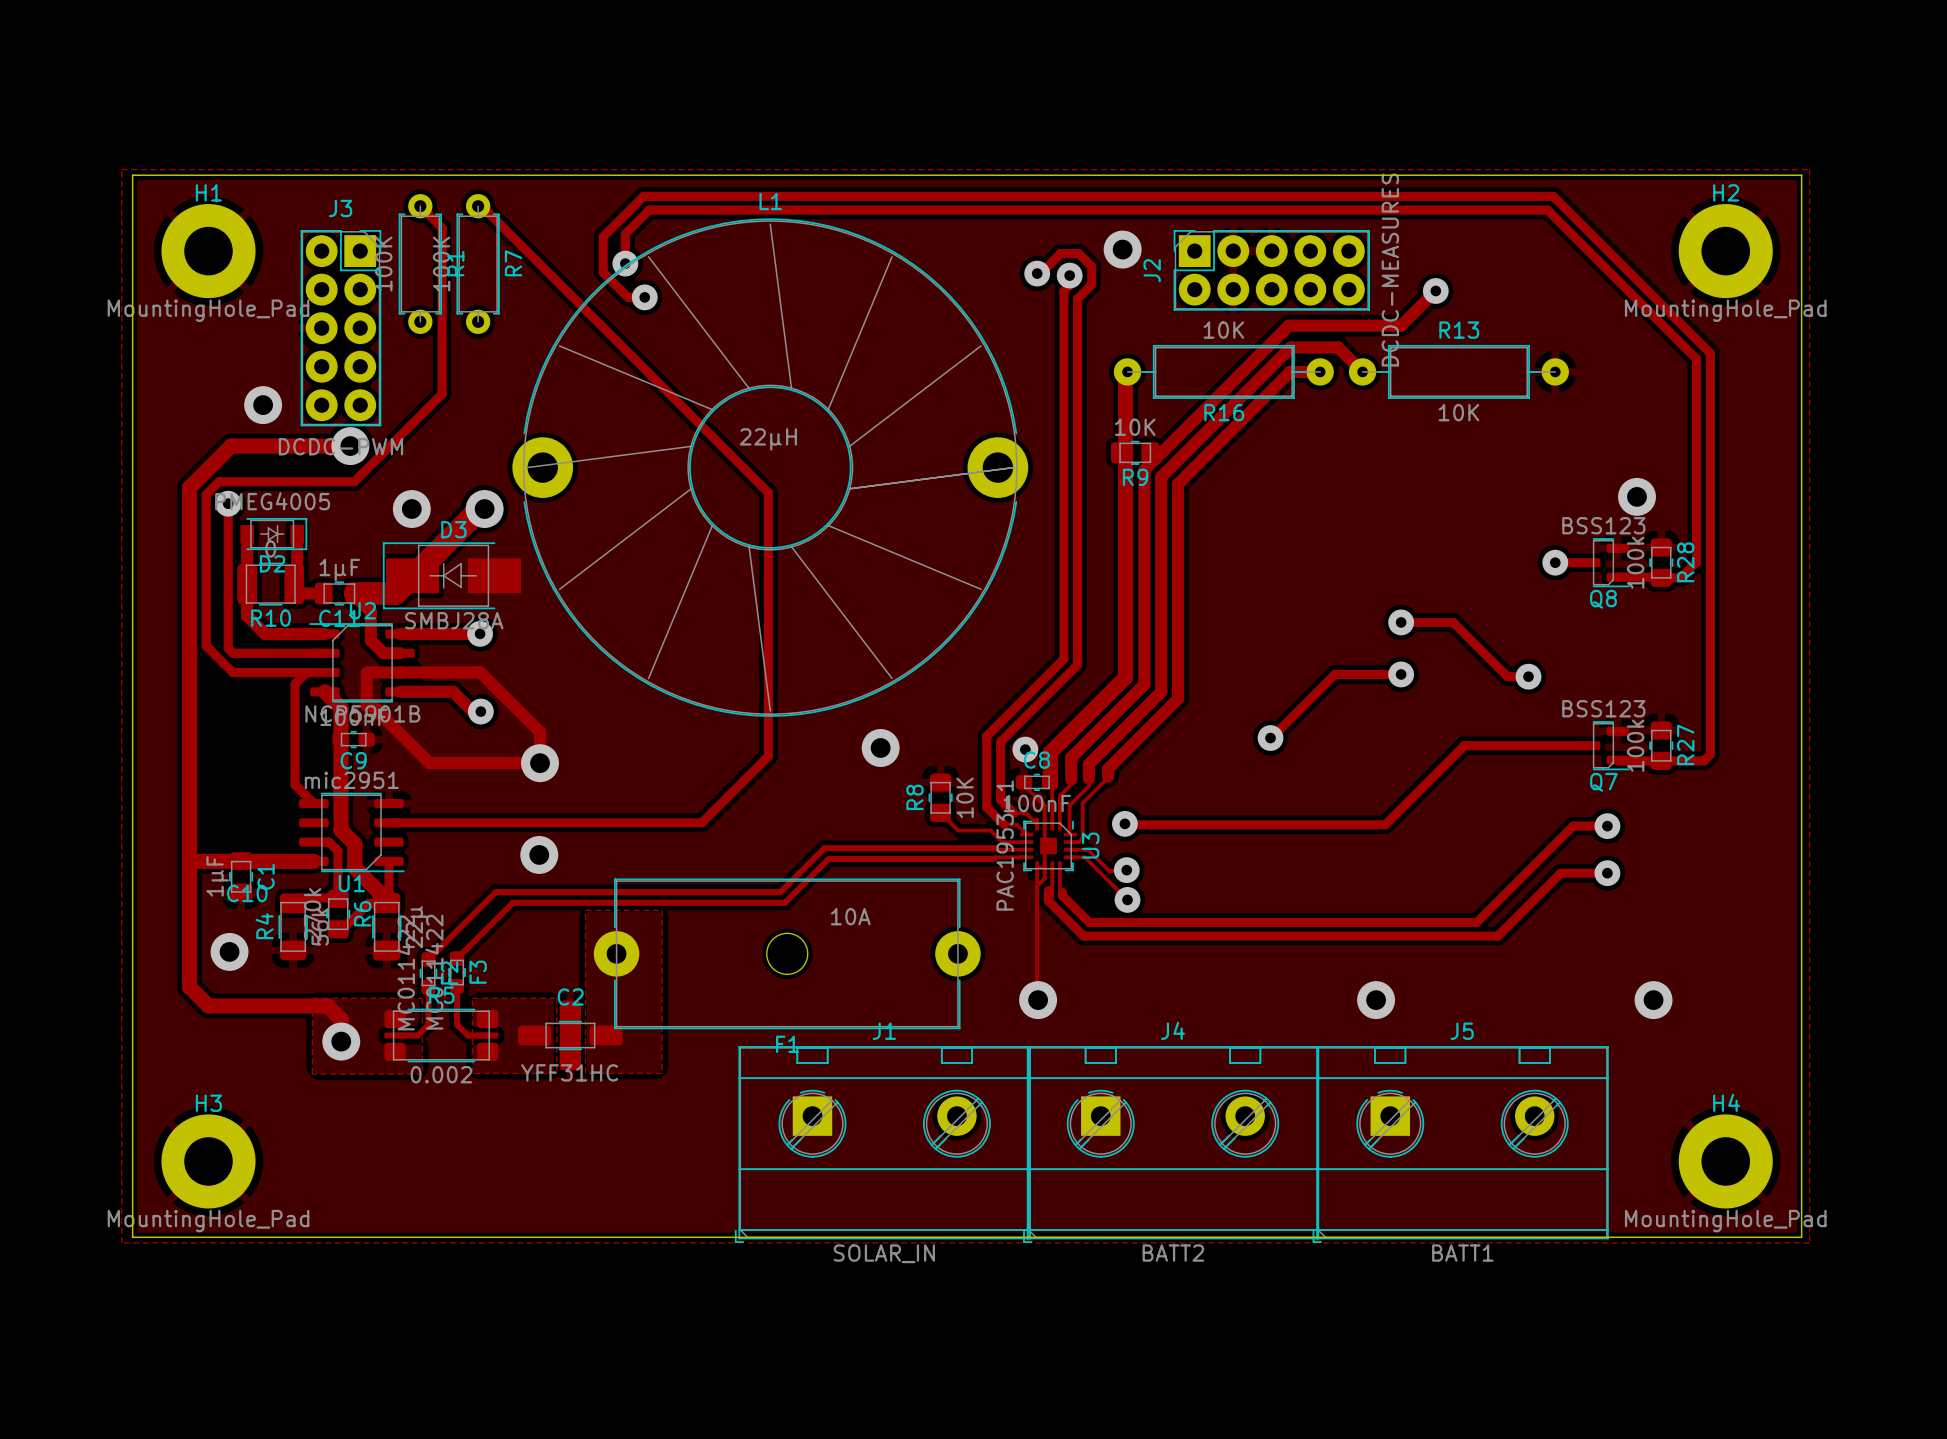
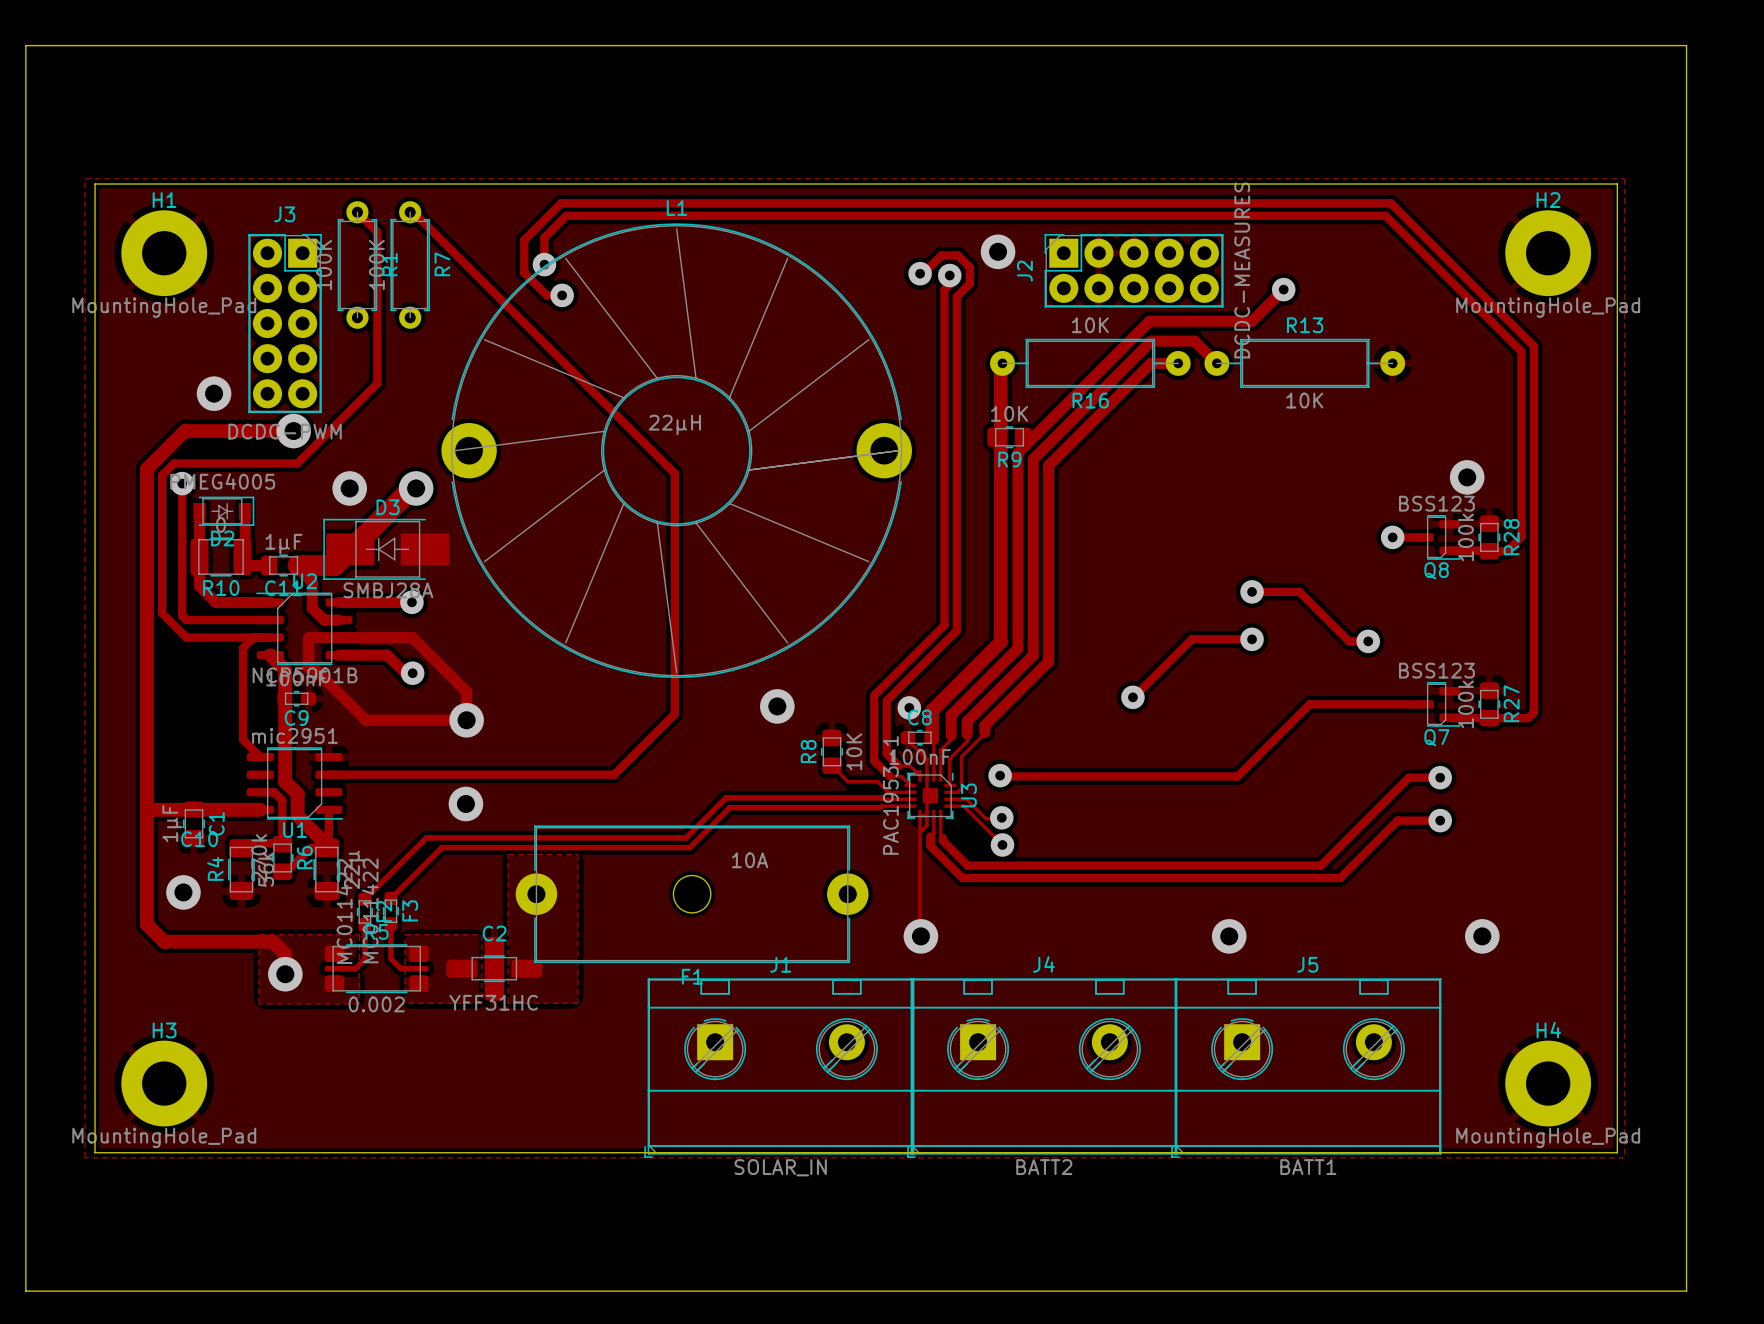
board edge: none -> (25, 45) (1686, 45) (1686, 1291) (25, 1291) (25, 45)

